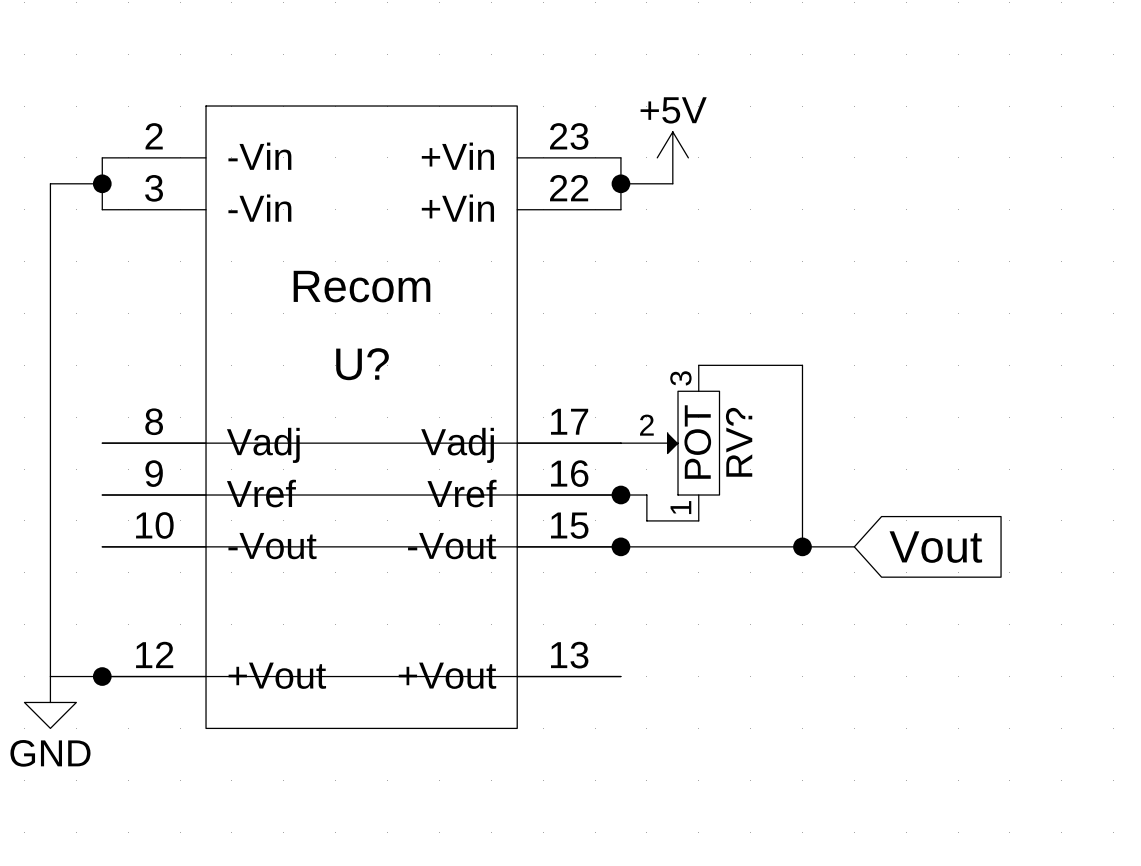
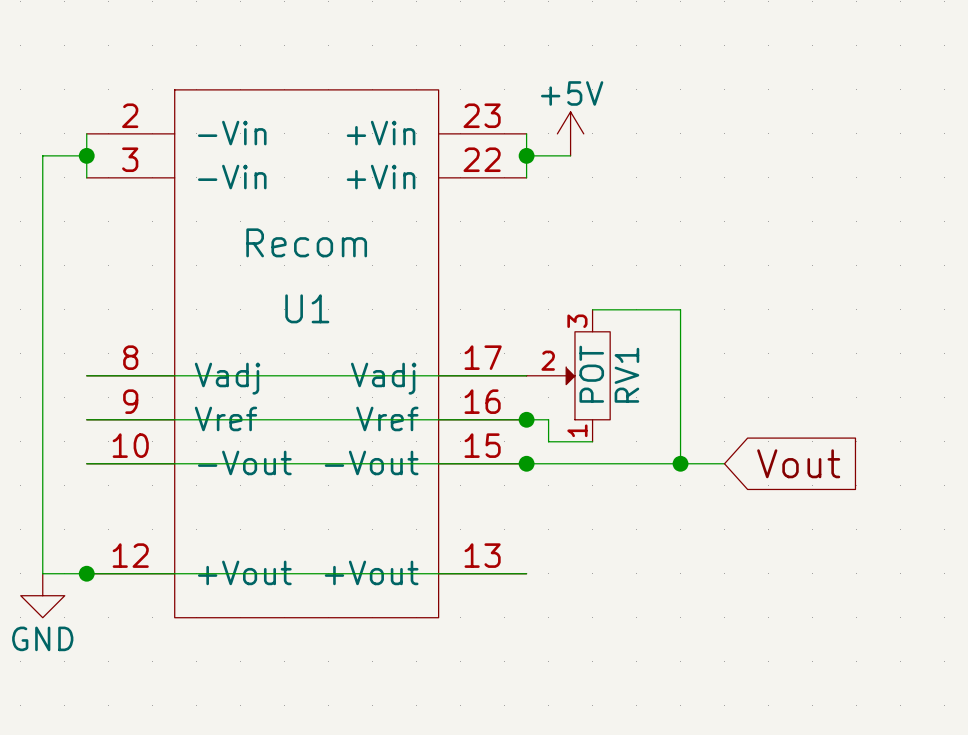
U? name: U? (362, 364) -> U1 (307, 308)
RV? name: RV? (739, 442) -> RV1 (626, 375)

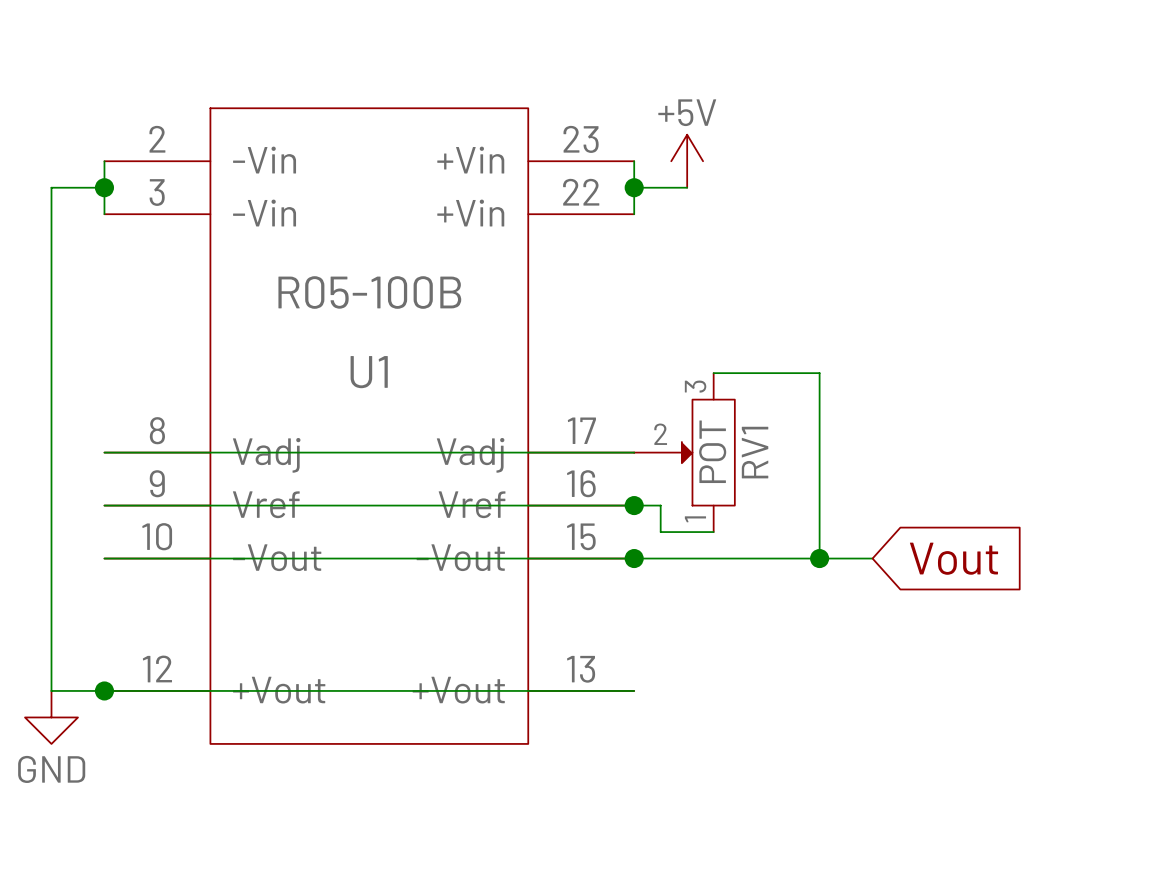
U1 value: Recom (306, 242) -> R05-100B (369, 292)

